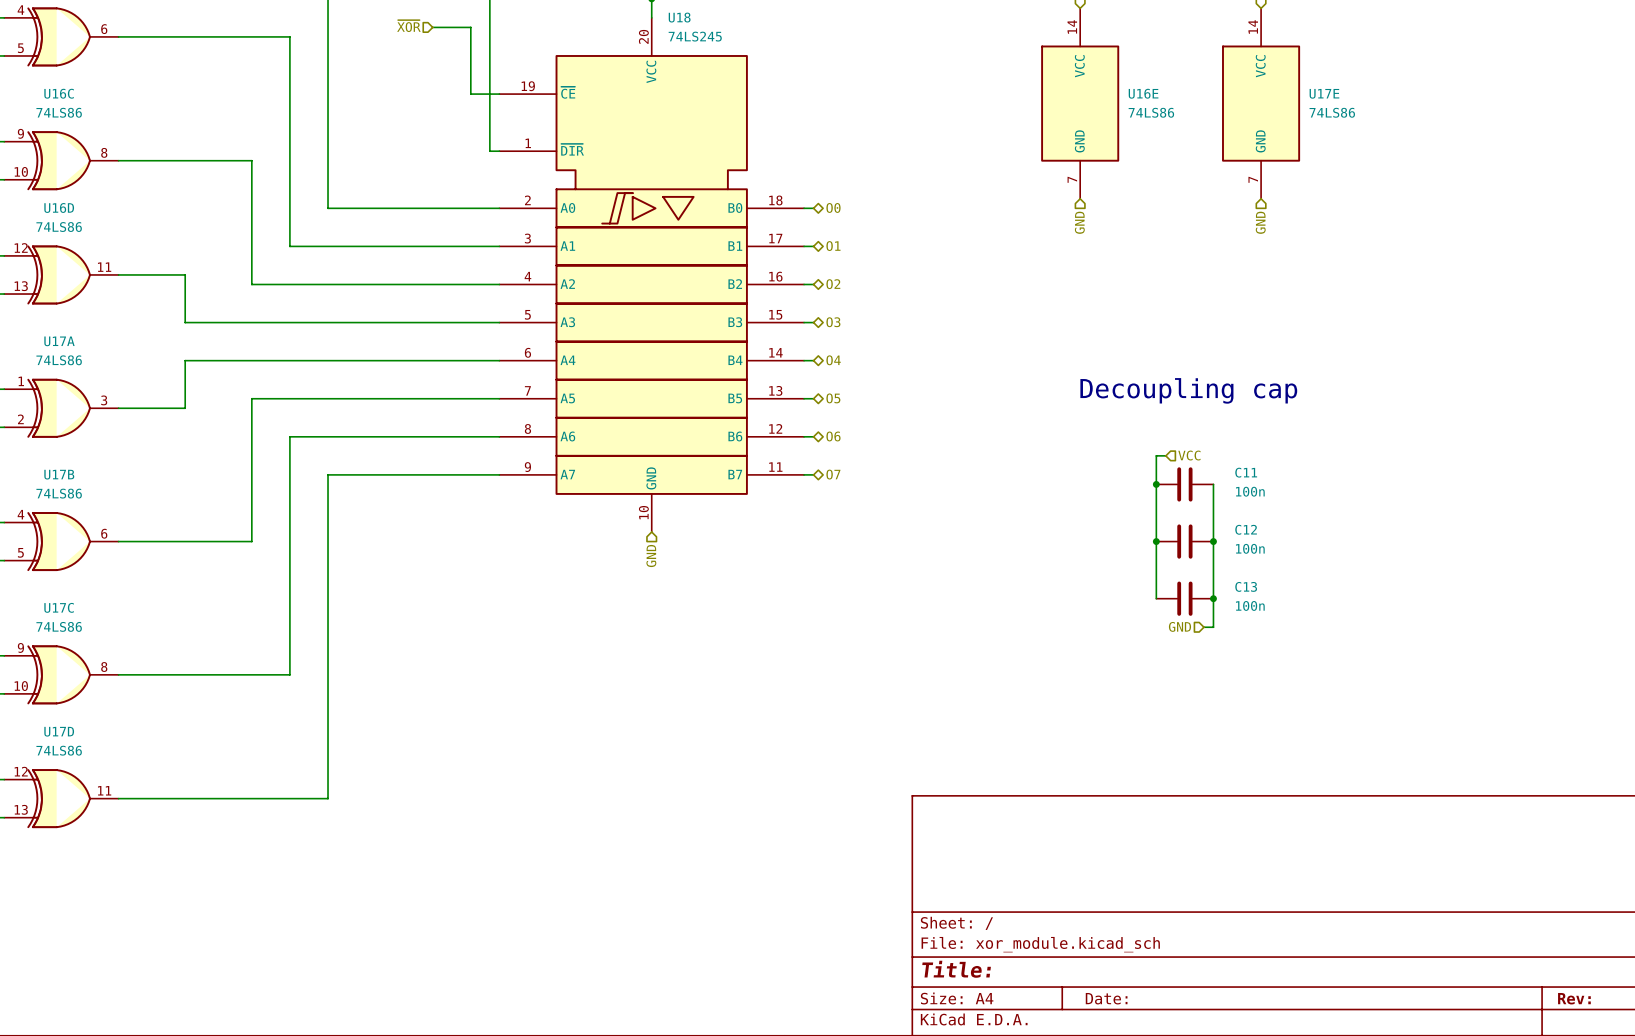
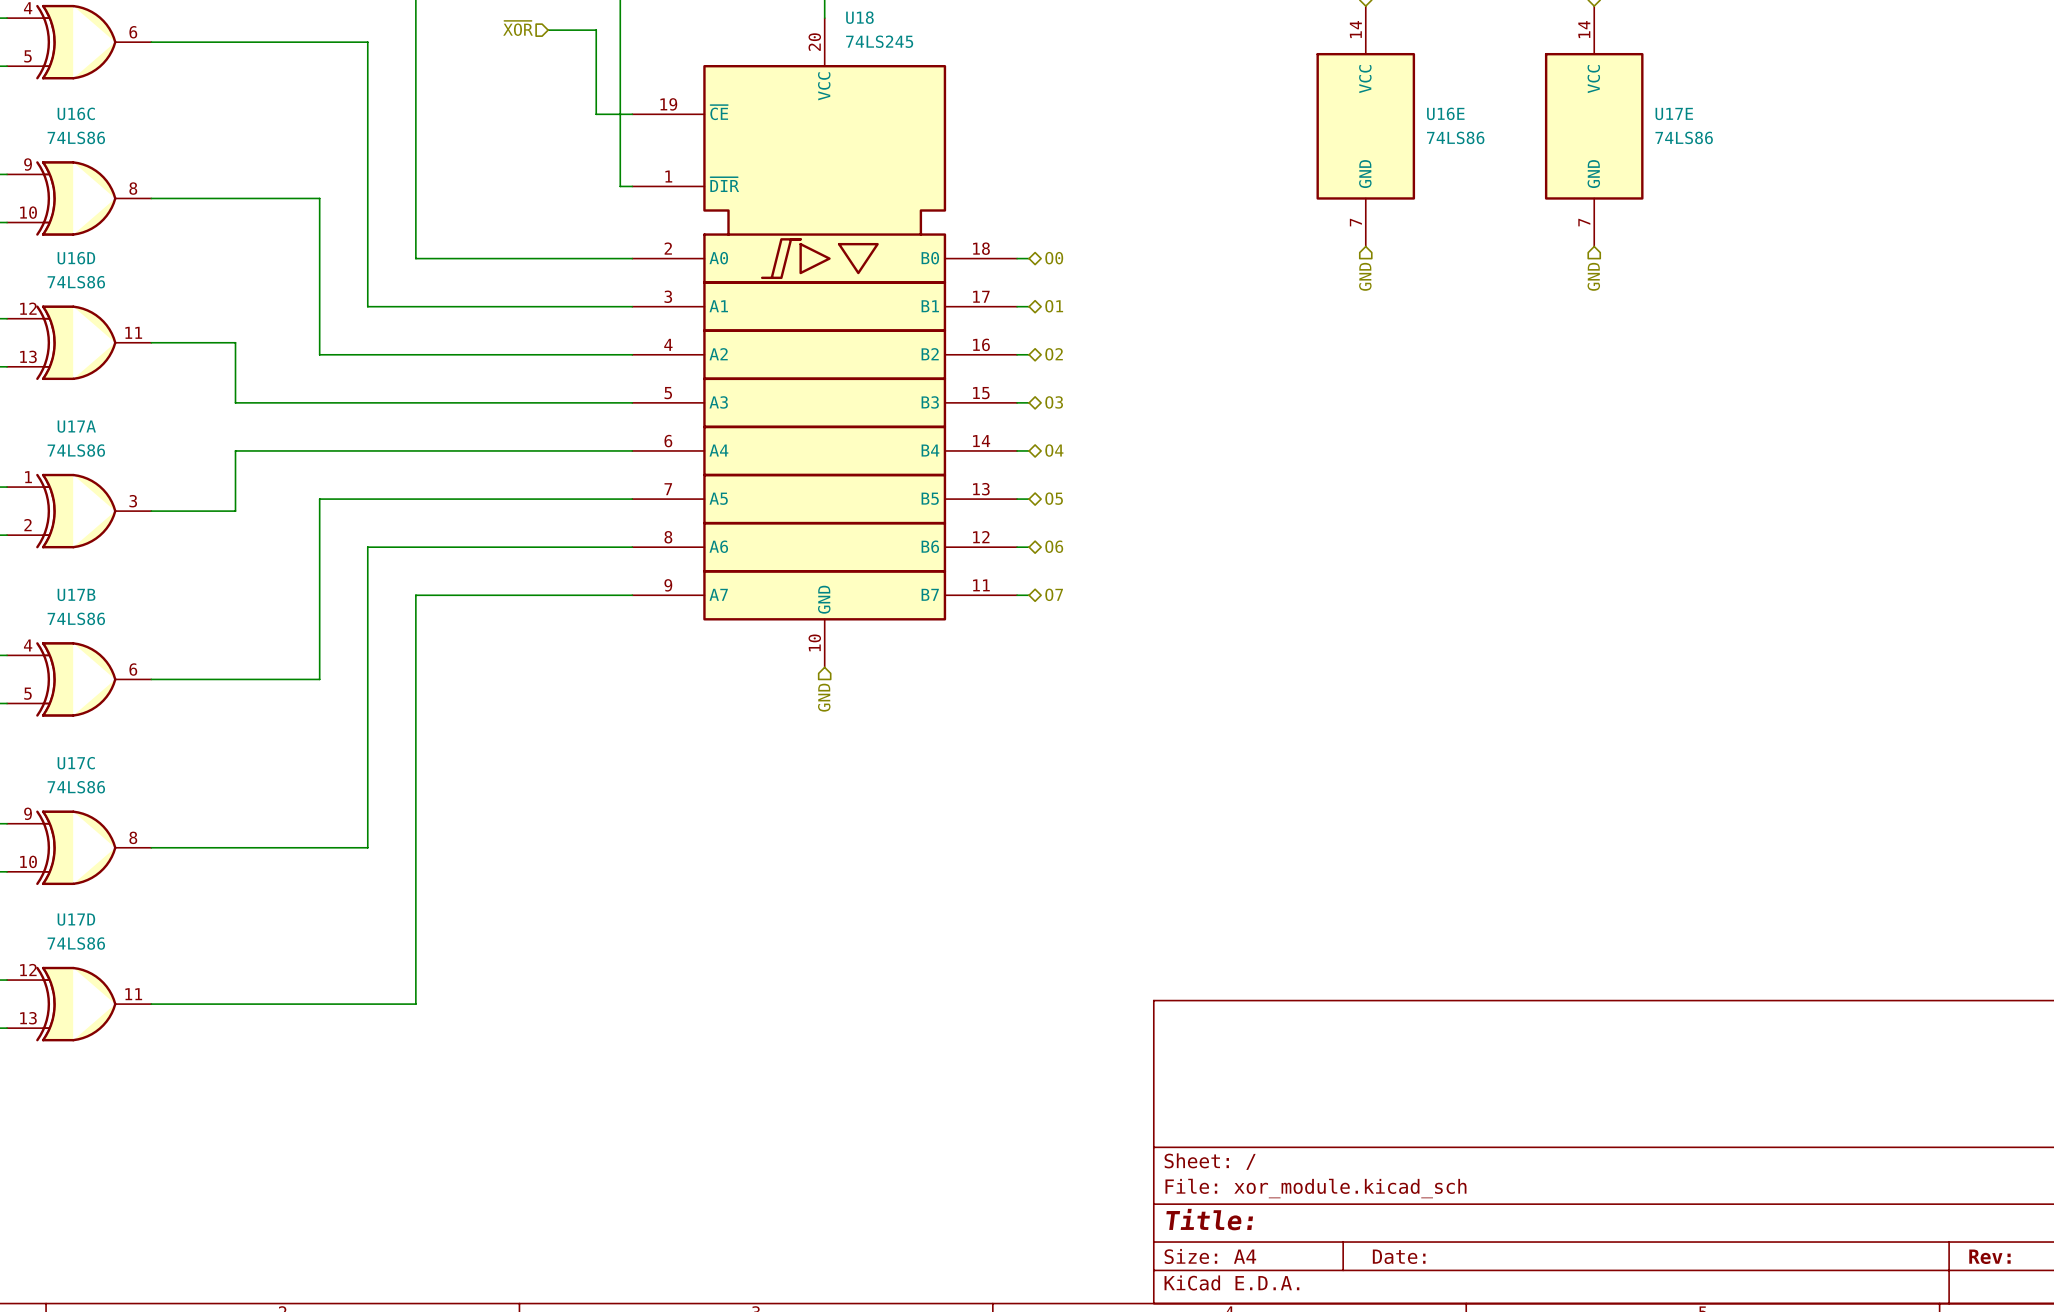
text: Decoupling cap (1188, 390) -> none
wire: (1165, 455) (1156, 455) (1156, 598) -> none
hierarchical label: VCC (1189, 455) -> none
junction: (1156, 484) -> none
C11: 100n (1184, 484) -> none
wire: (1213, 484) (1213, 627) (1203, 627) -> none
junction: (1156, 541) -> none
C12: 100n (1184, 541) -> none
junction: (1213, 541) -> none
C13: 100n (1184, 598) -> none
junction: (1213, 598) -> none
hierarchical label: GND (1179, 626) -> none

